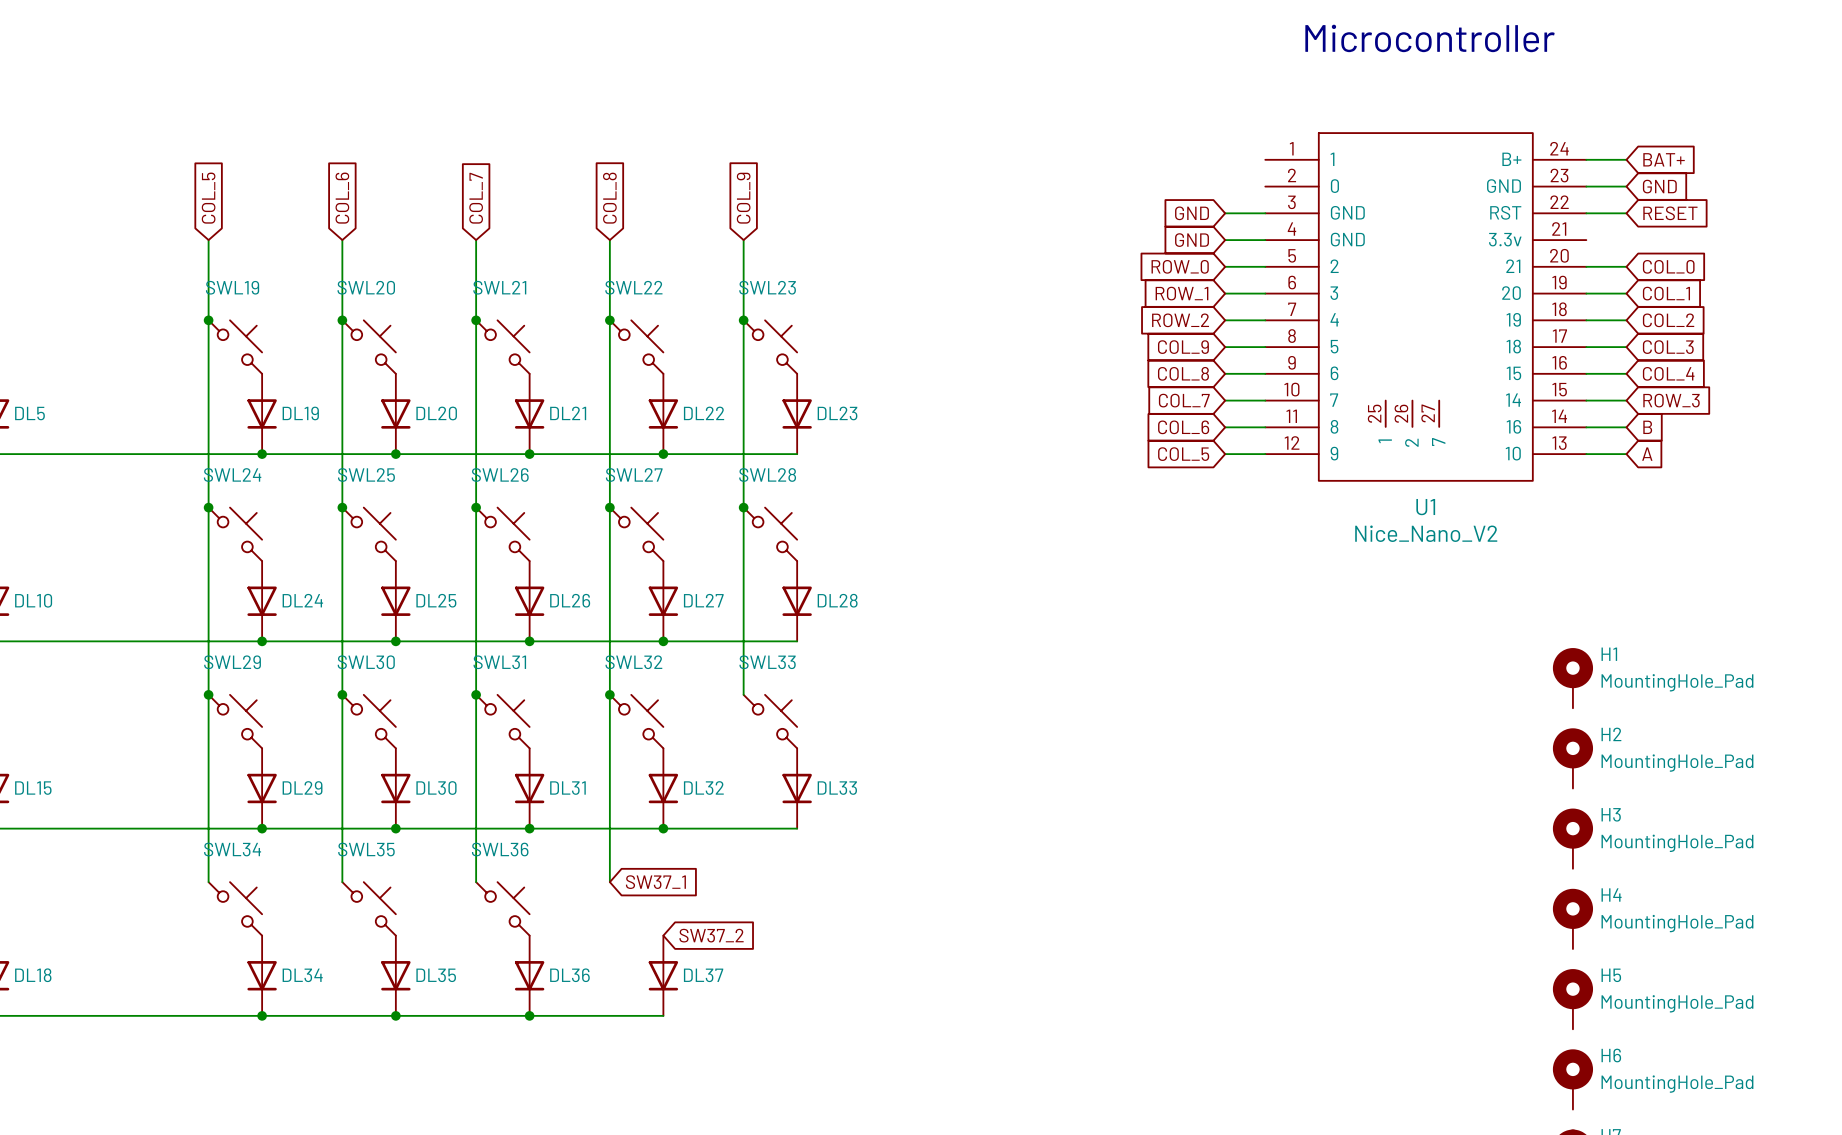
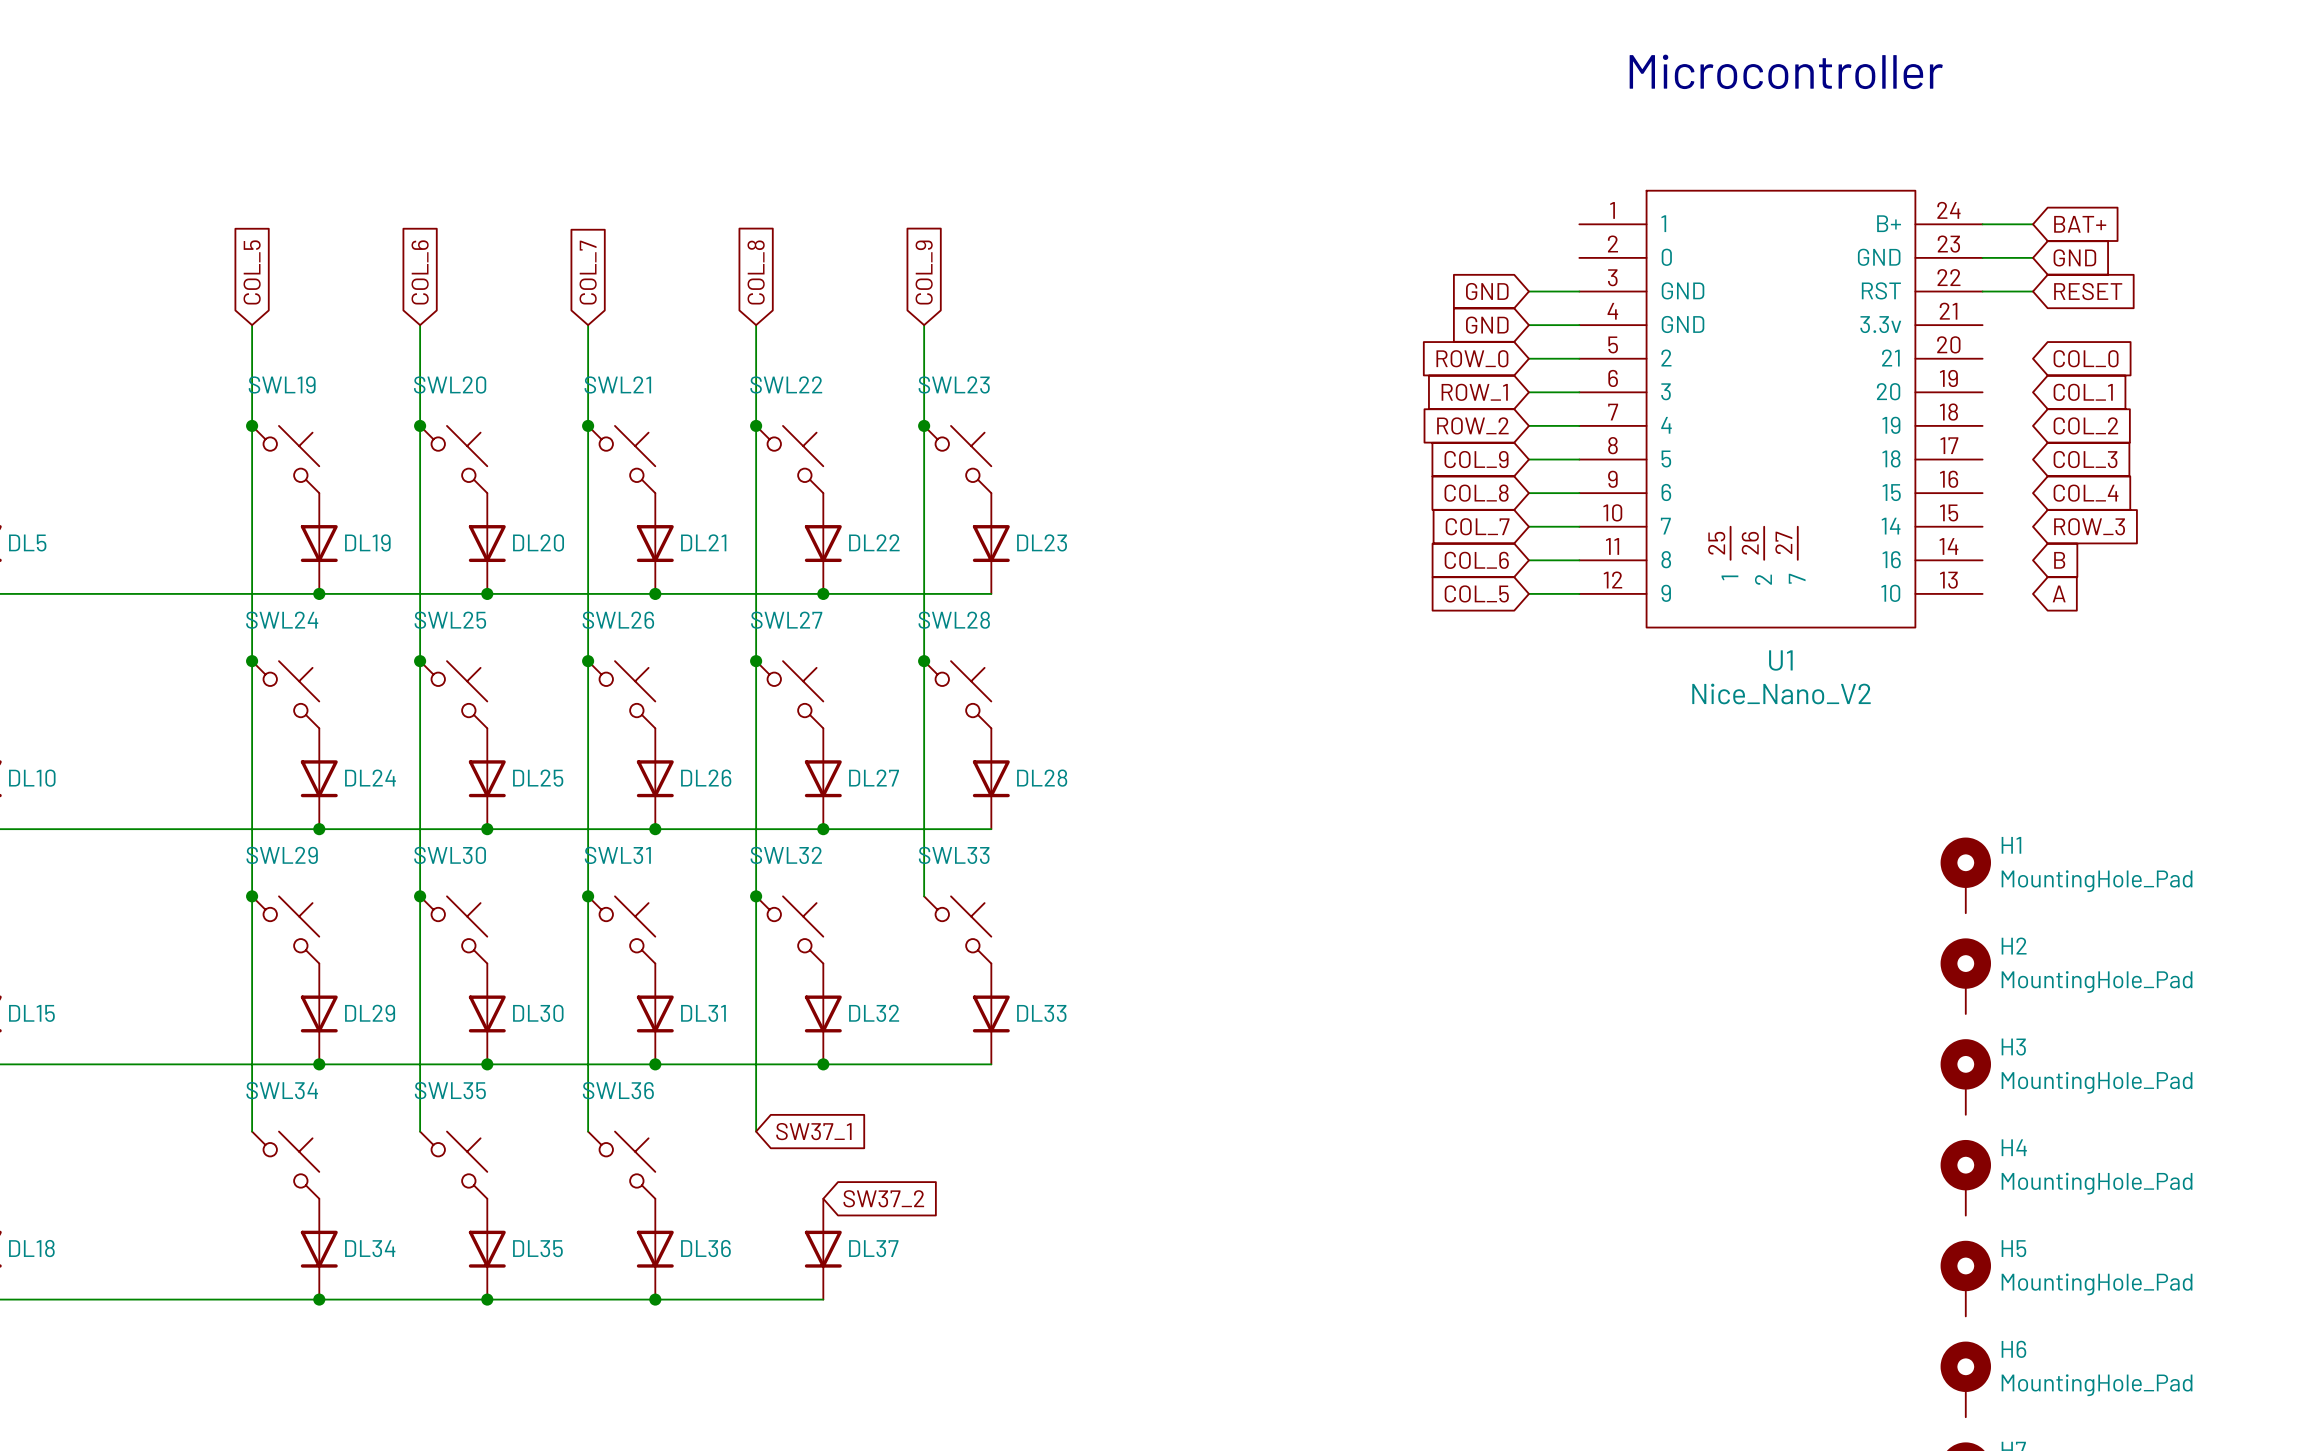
wire: (1586, 266) (1626, 266) -> none
wire: (1586, 293) (1626, 293) -> none
wire: (1586, 320) (1626, 320) -> none
wire: (1586, 347) (1626, 347) -> none
wire: (1586, 373) (1626, 373) -> none
wire: (1586, 400) (1626, 400) -> none
wire: (1586, 427) (1626, 427) -> none
wire: (1586, 454) (1626, 454) -> none

